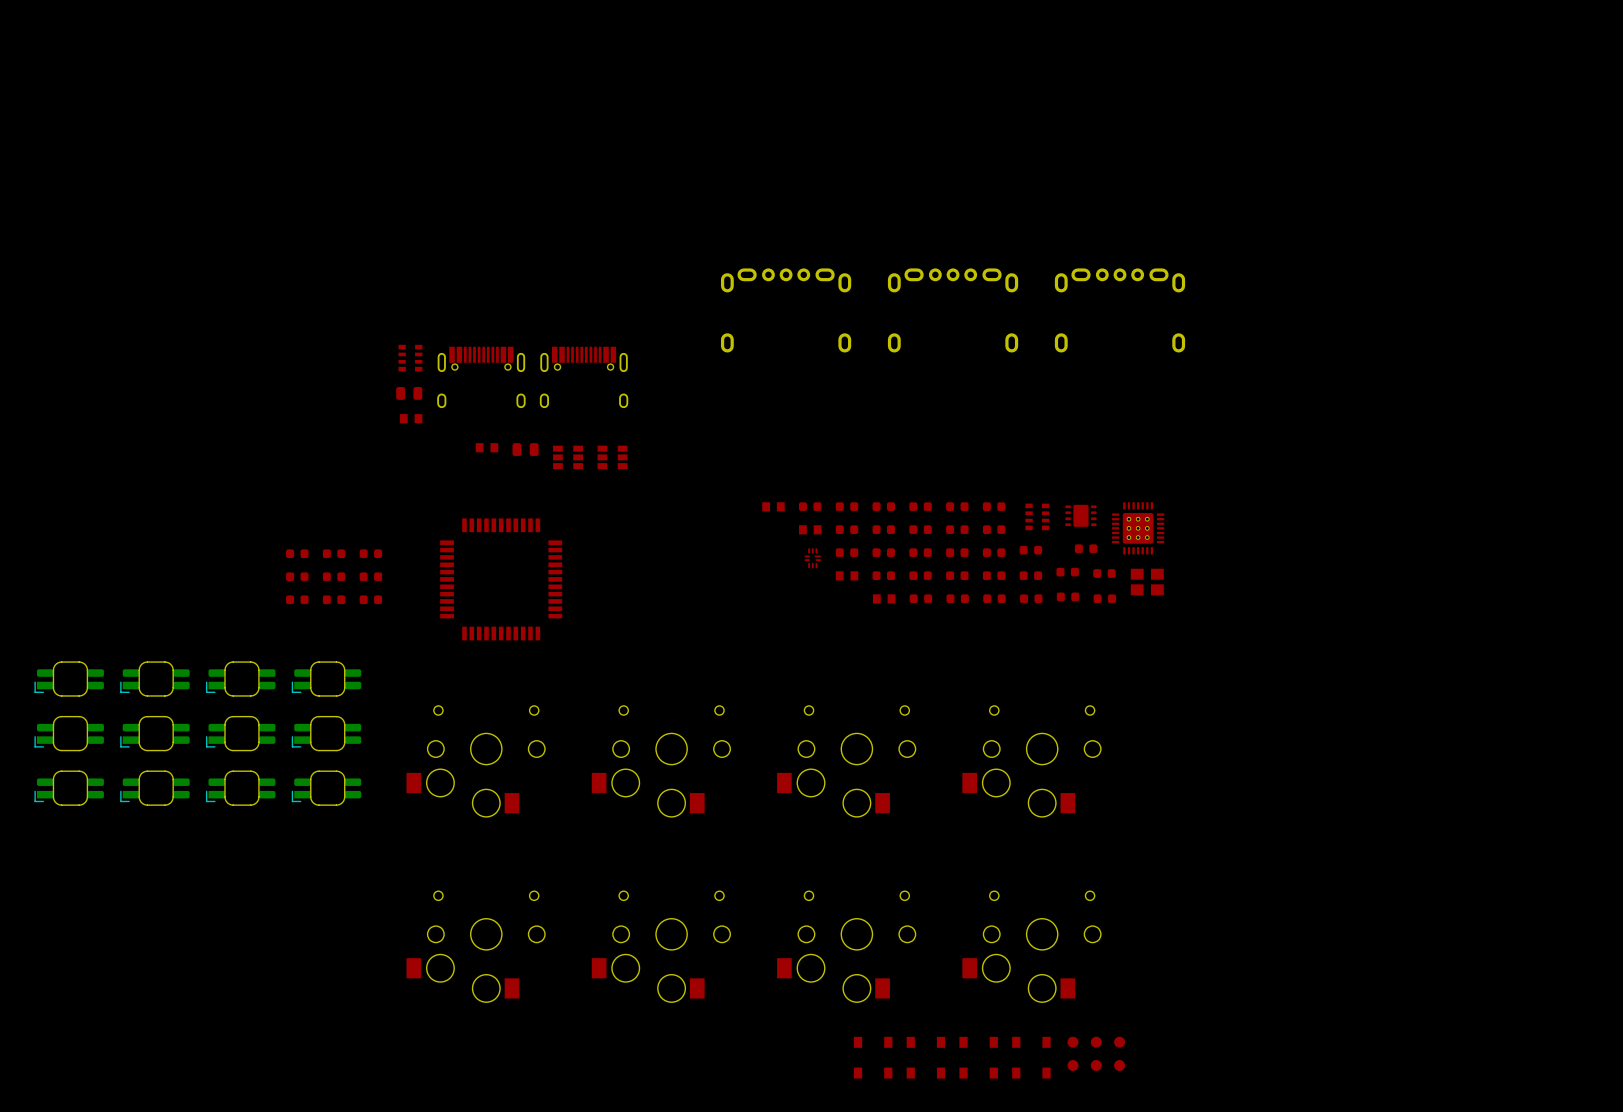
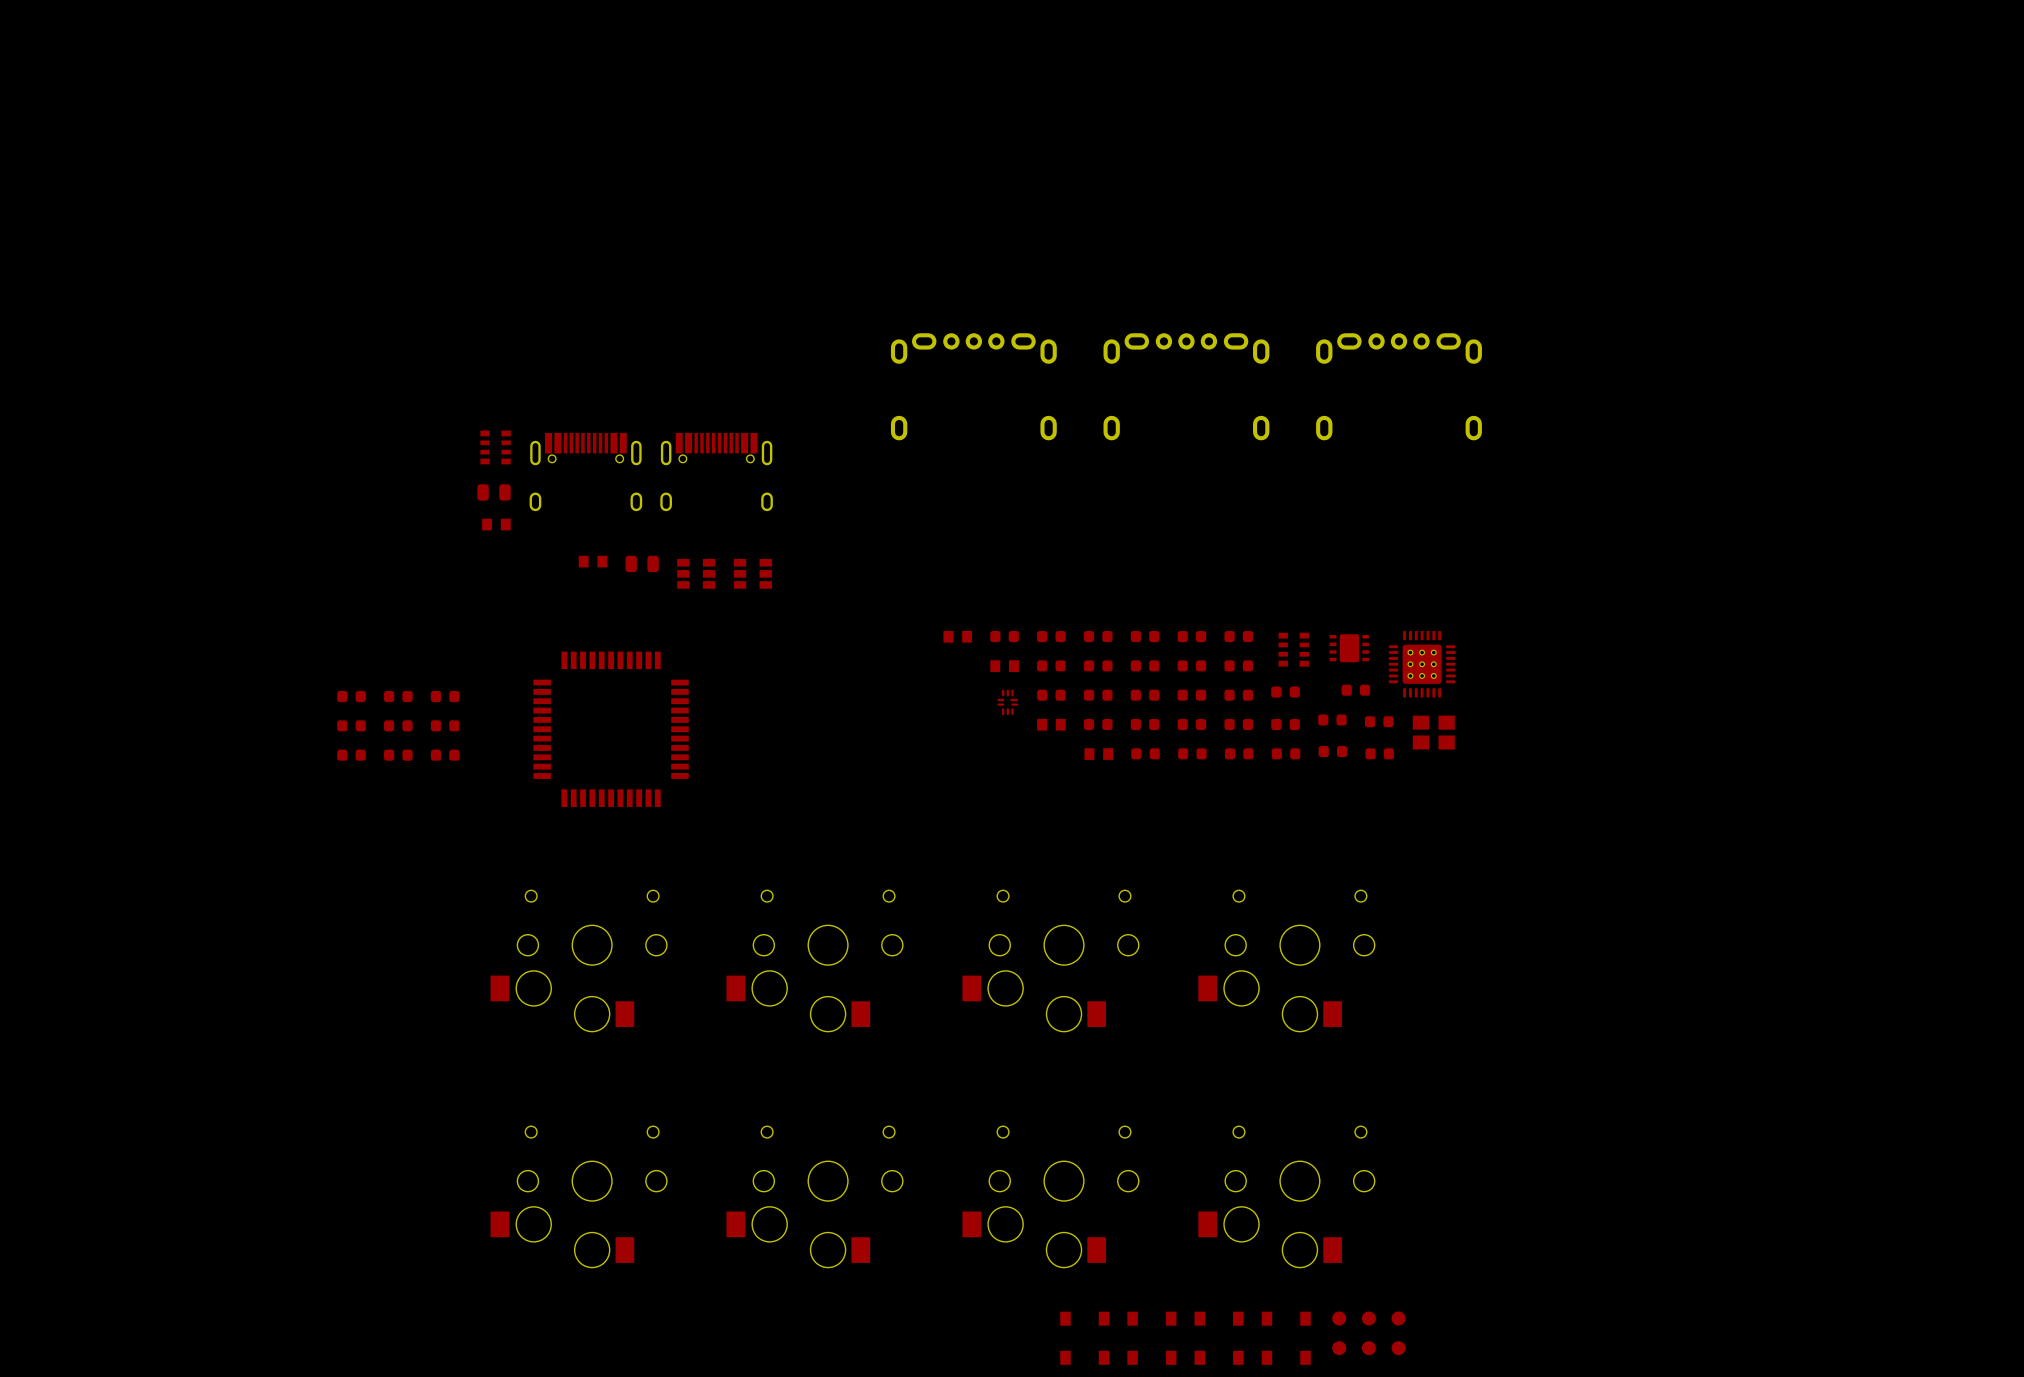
part: (69, 679) -> none
part: (155, 679) -> none
part: (240, 679) -> none
part: (326, 679) -> none
part: (69, 733) -> none
part: (155, 733) -> none
part: (240, 733) -> none
part: (326, 733) -> none
part: (69, 788) -> none
part: (155, 788) -> none
part: (240, 788) -> none
part: (326, 788) -> none

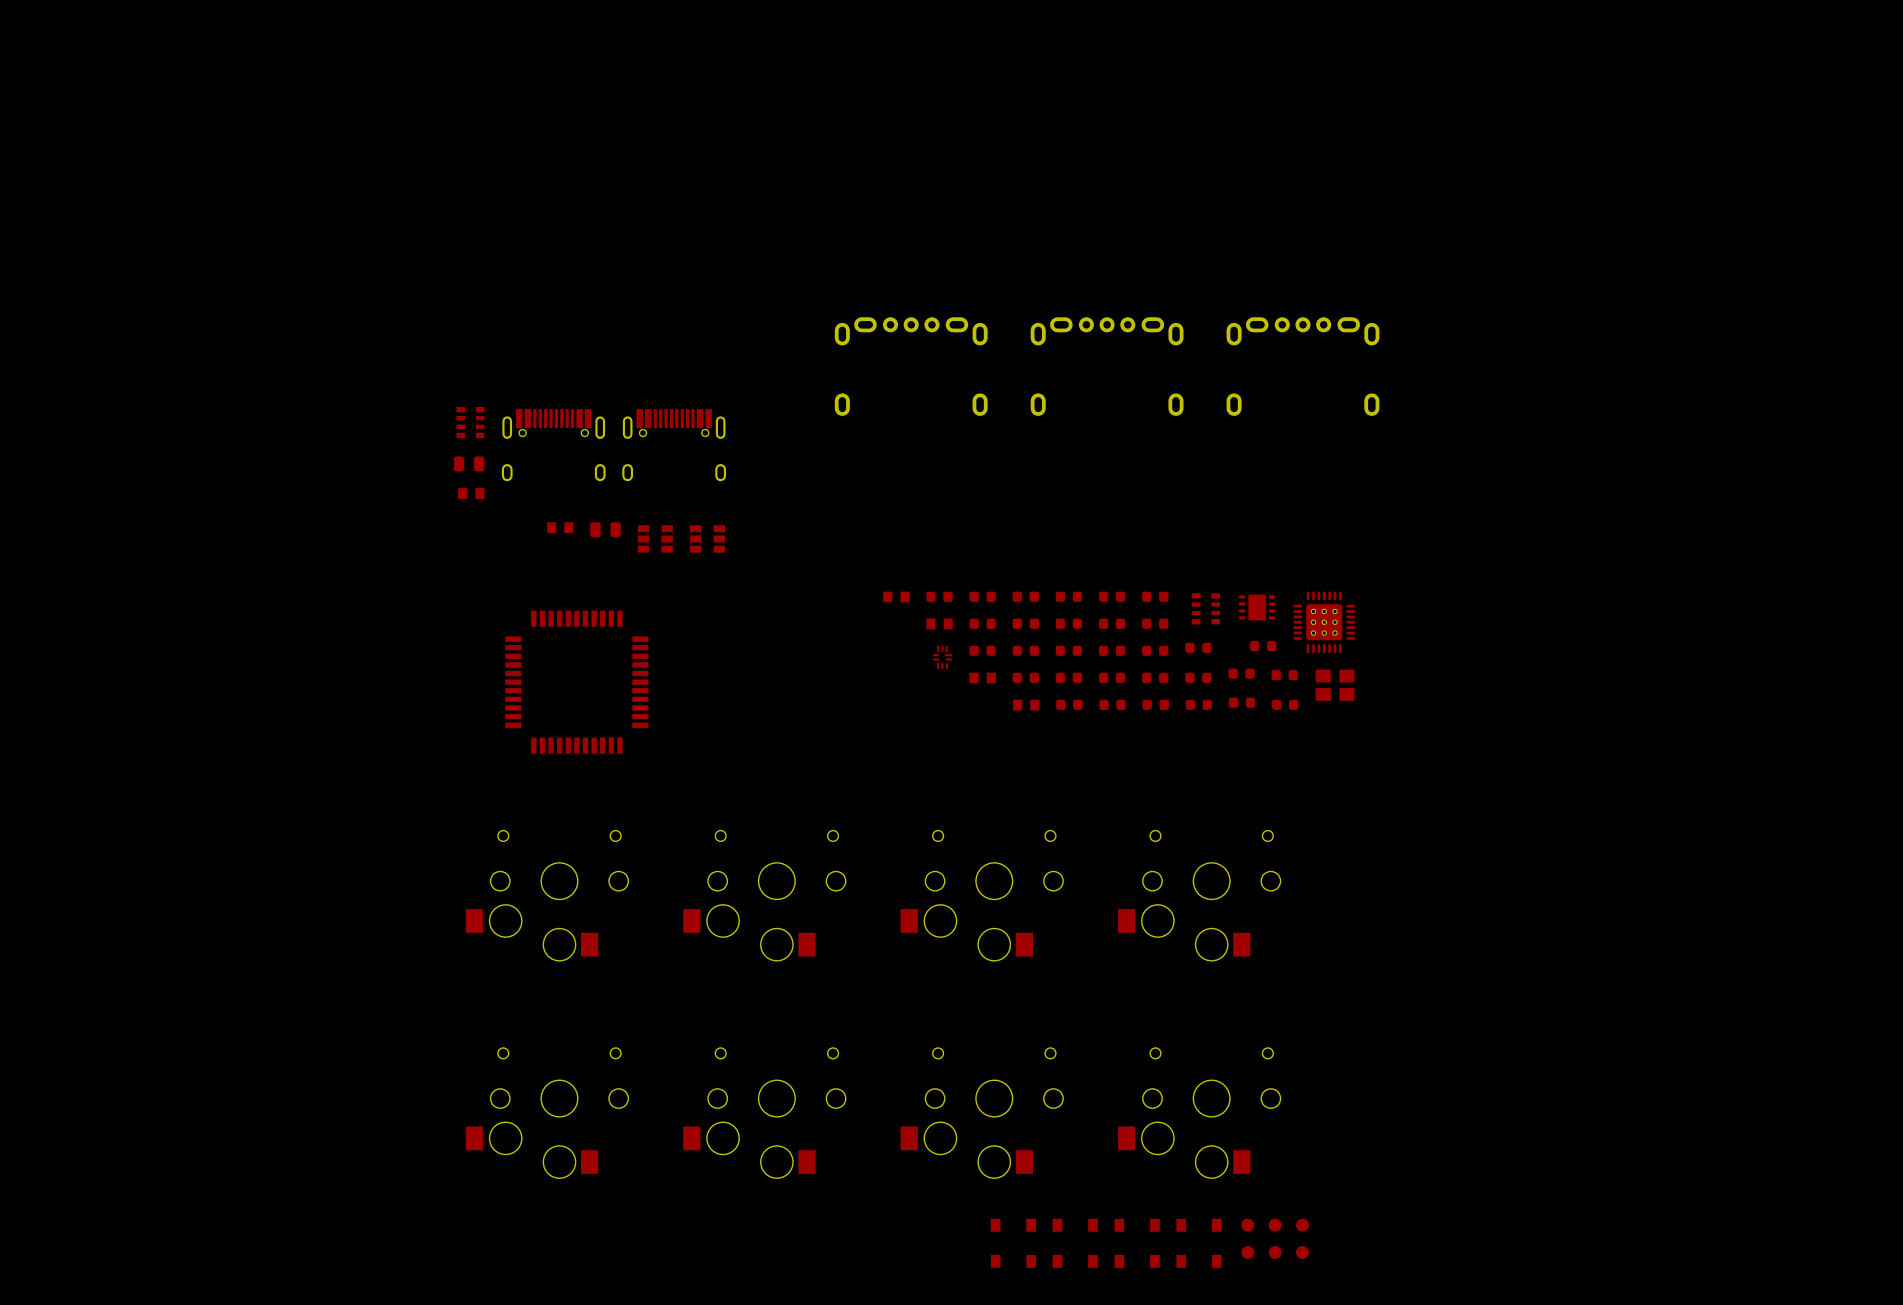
part: (351, 696) -> none
part: (398, 696) -> none
part: (445, 696) -> none
part: (351, 725) -> none
part: (398, 725) -> none
part: (445, 725) -> none
part: (351, 755) -> none
part: (398, 755) -> none
part: (445, 755) -> none

